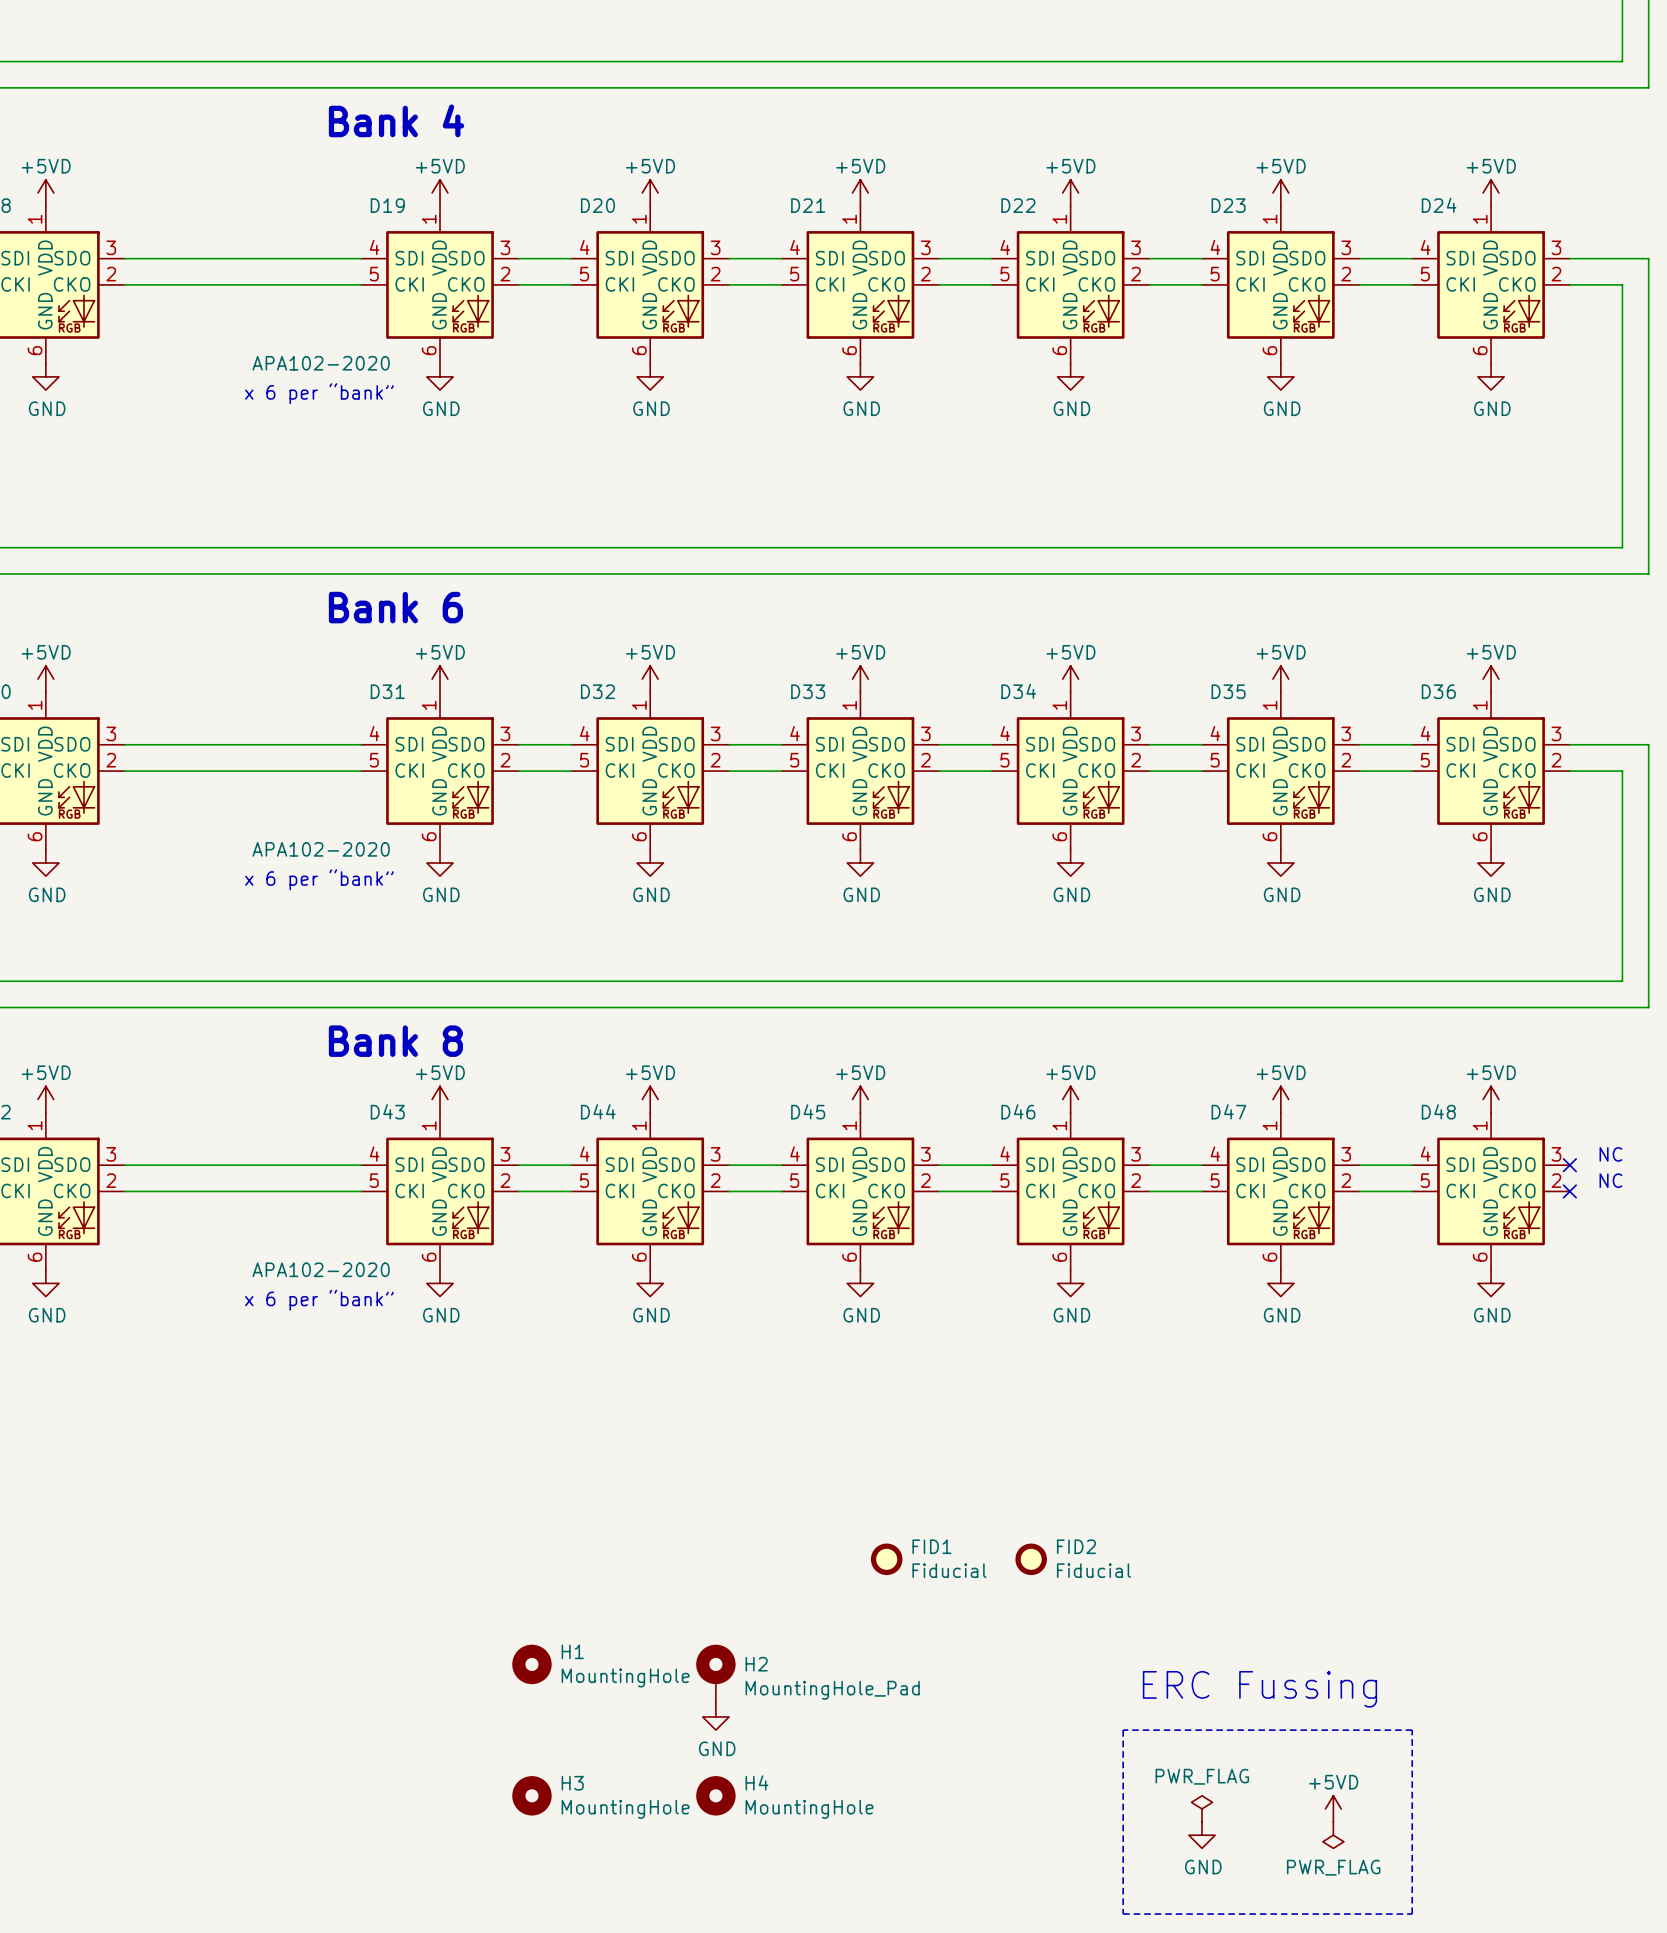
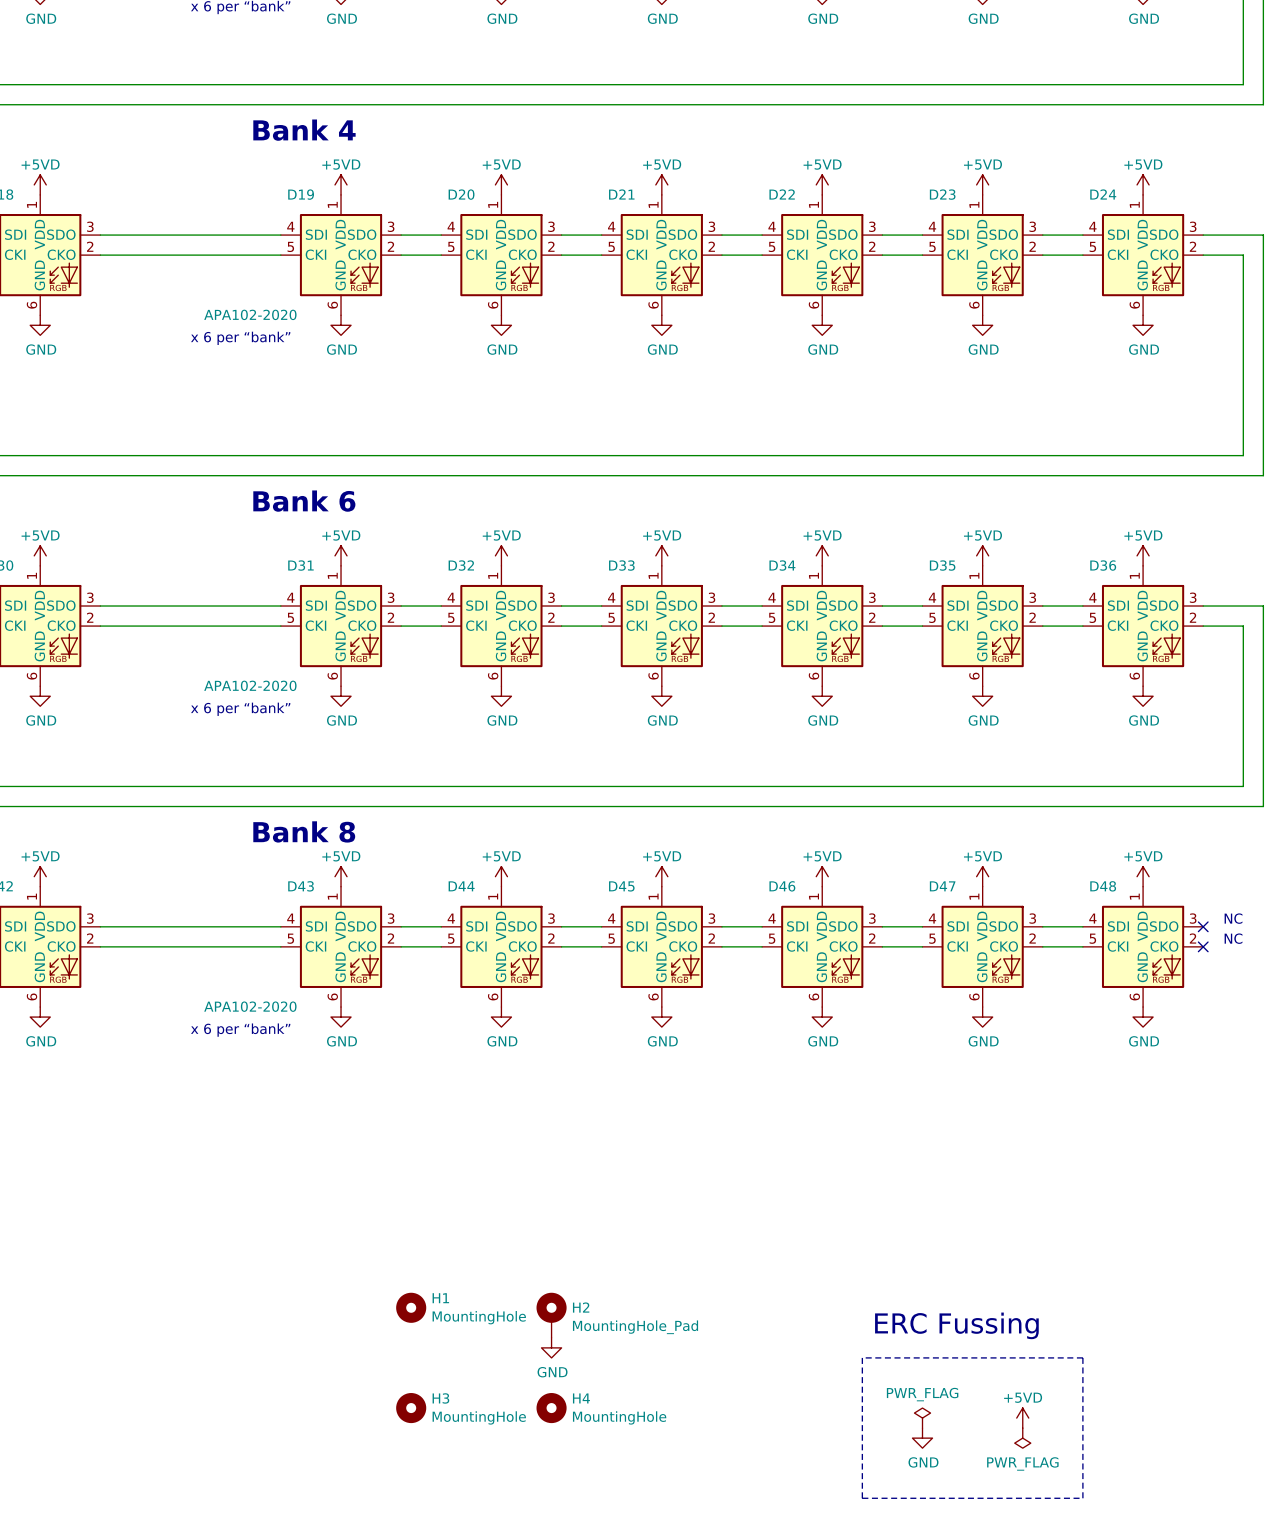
FID1: Fiducial (886, 1559) -> none
FID2: Fiducial (1031, 1559) -> none

